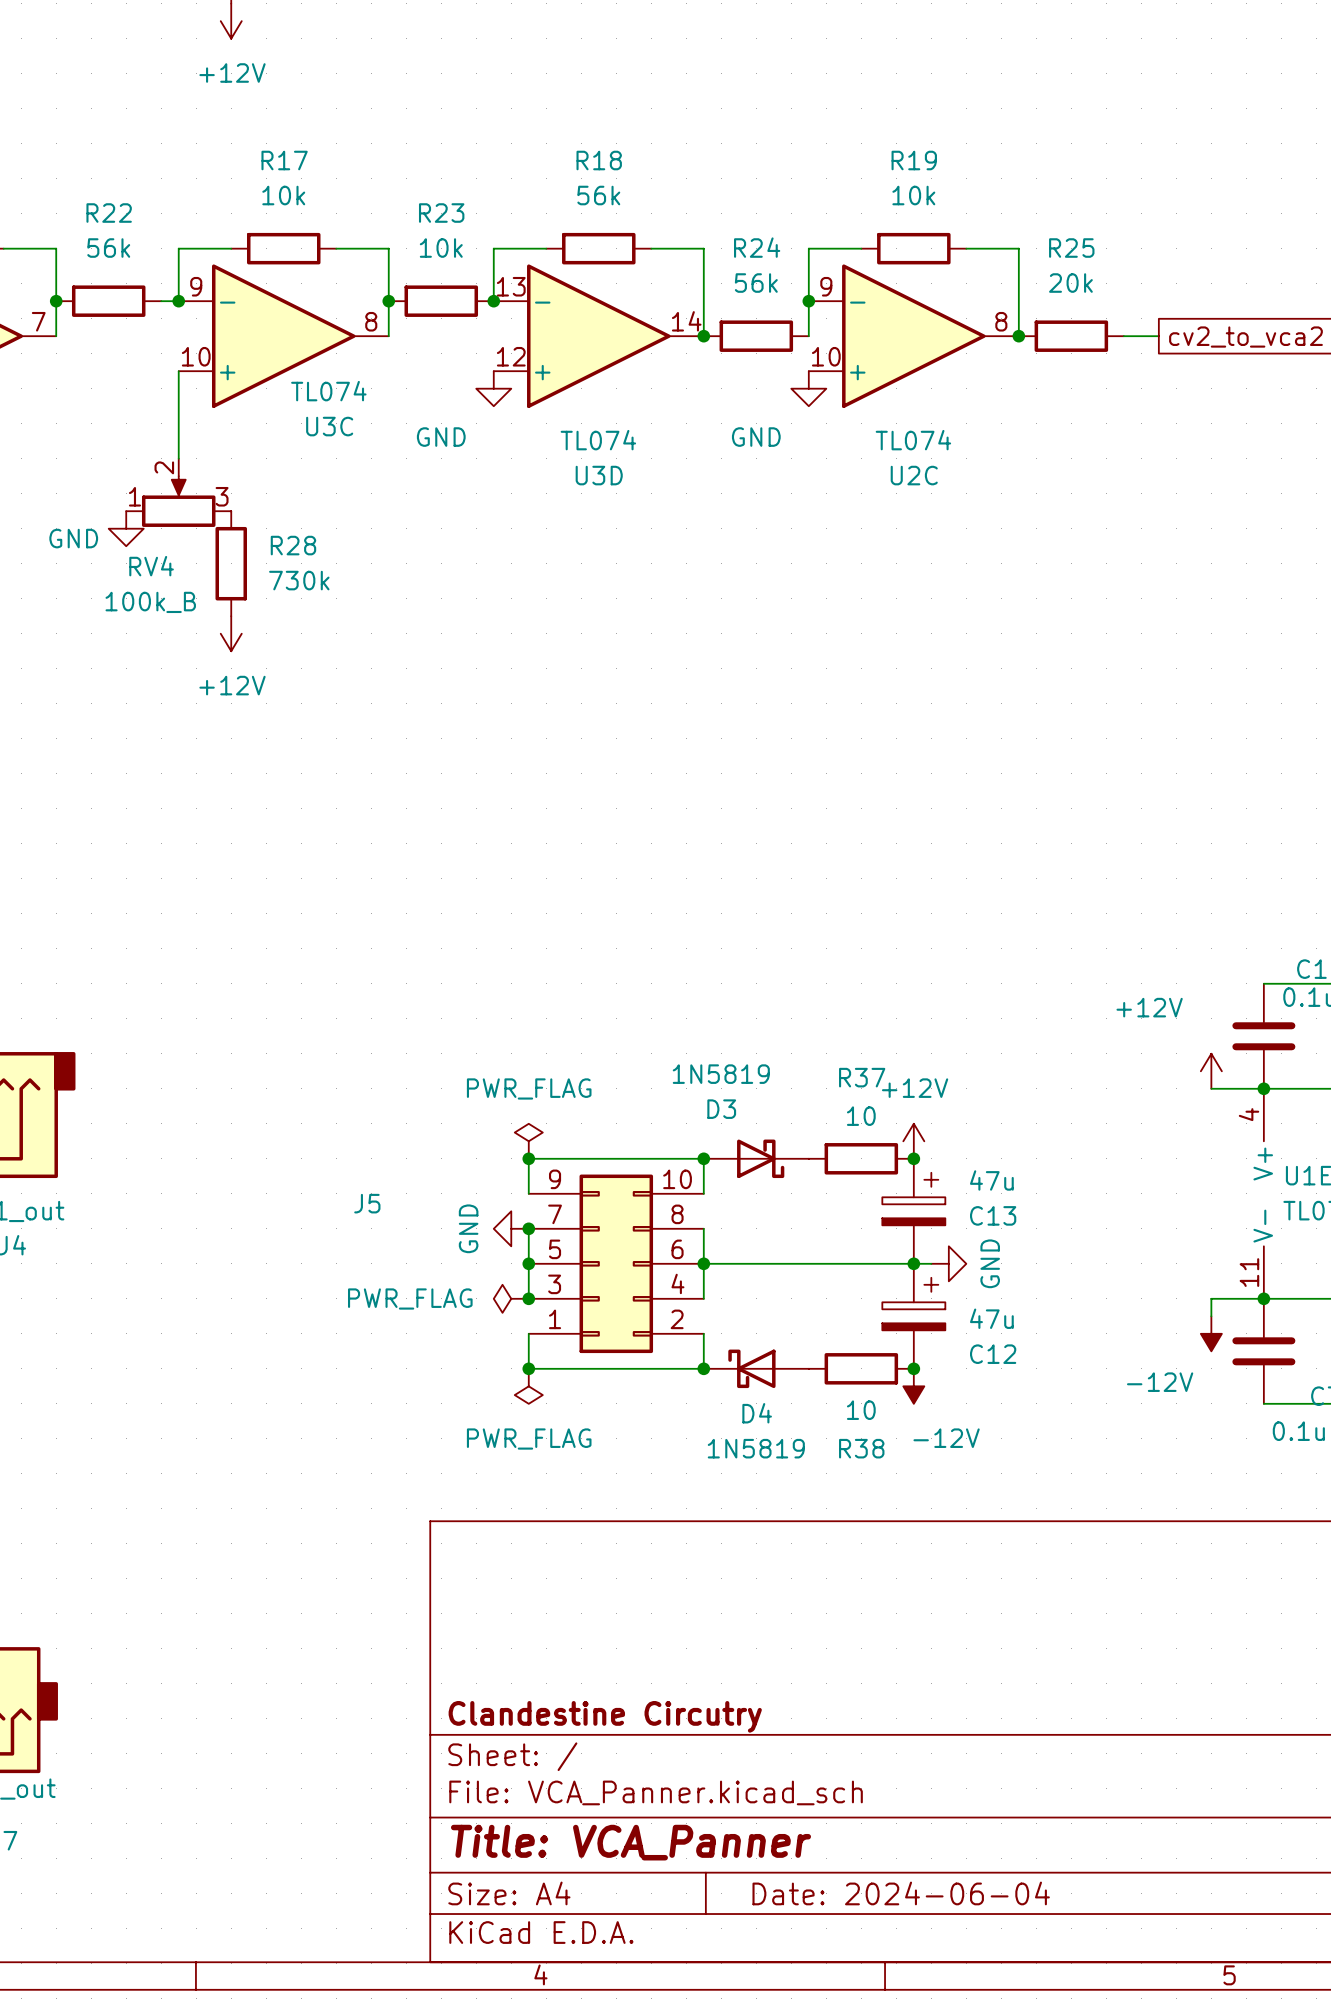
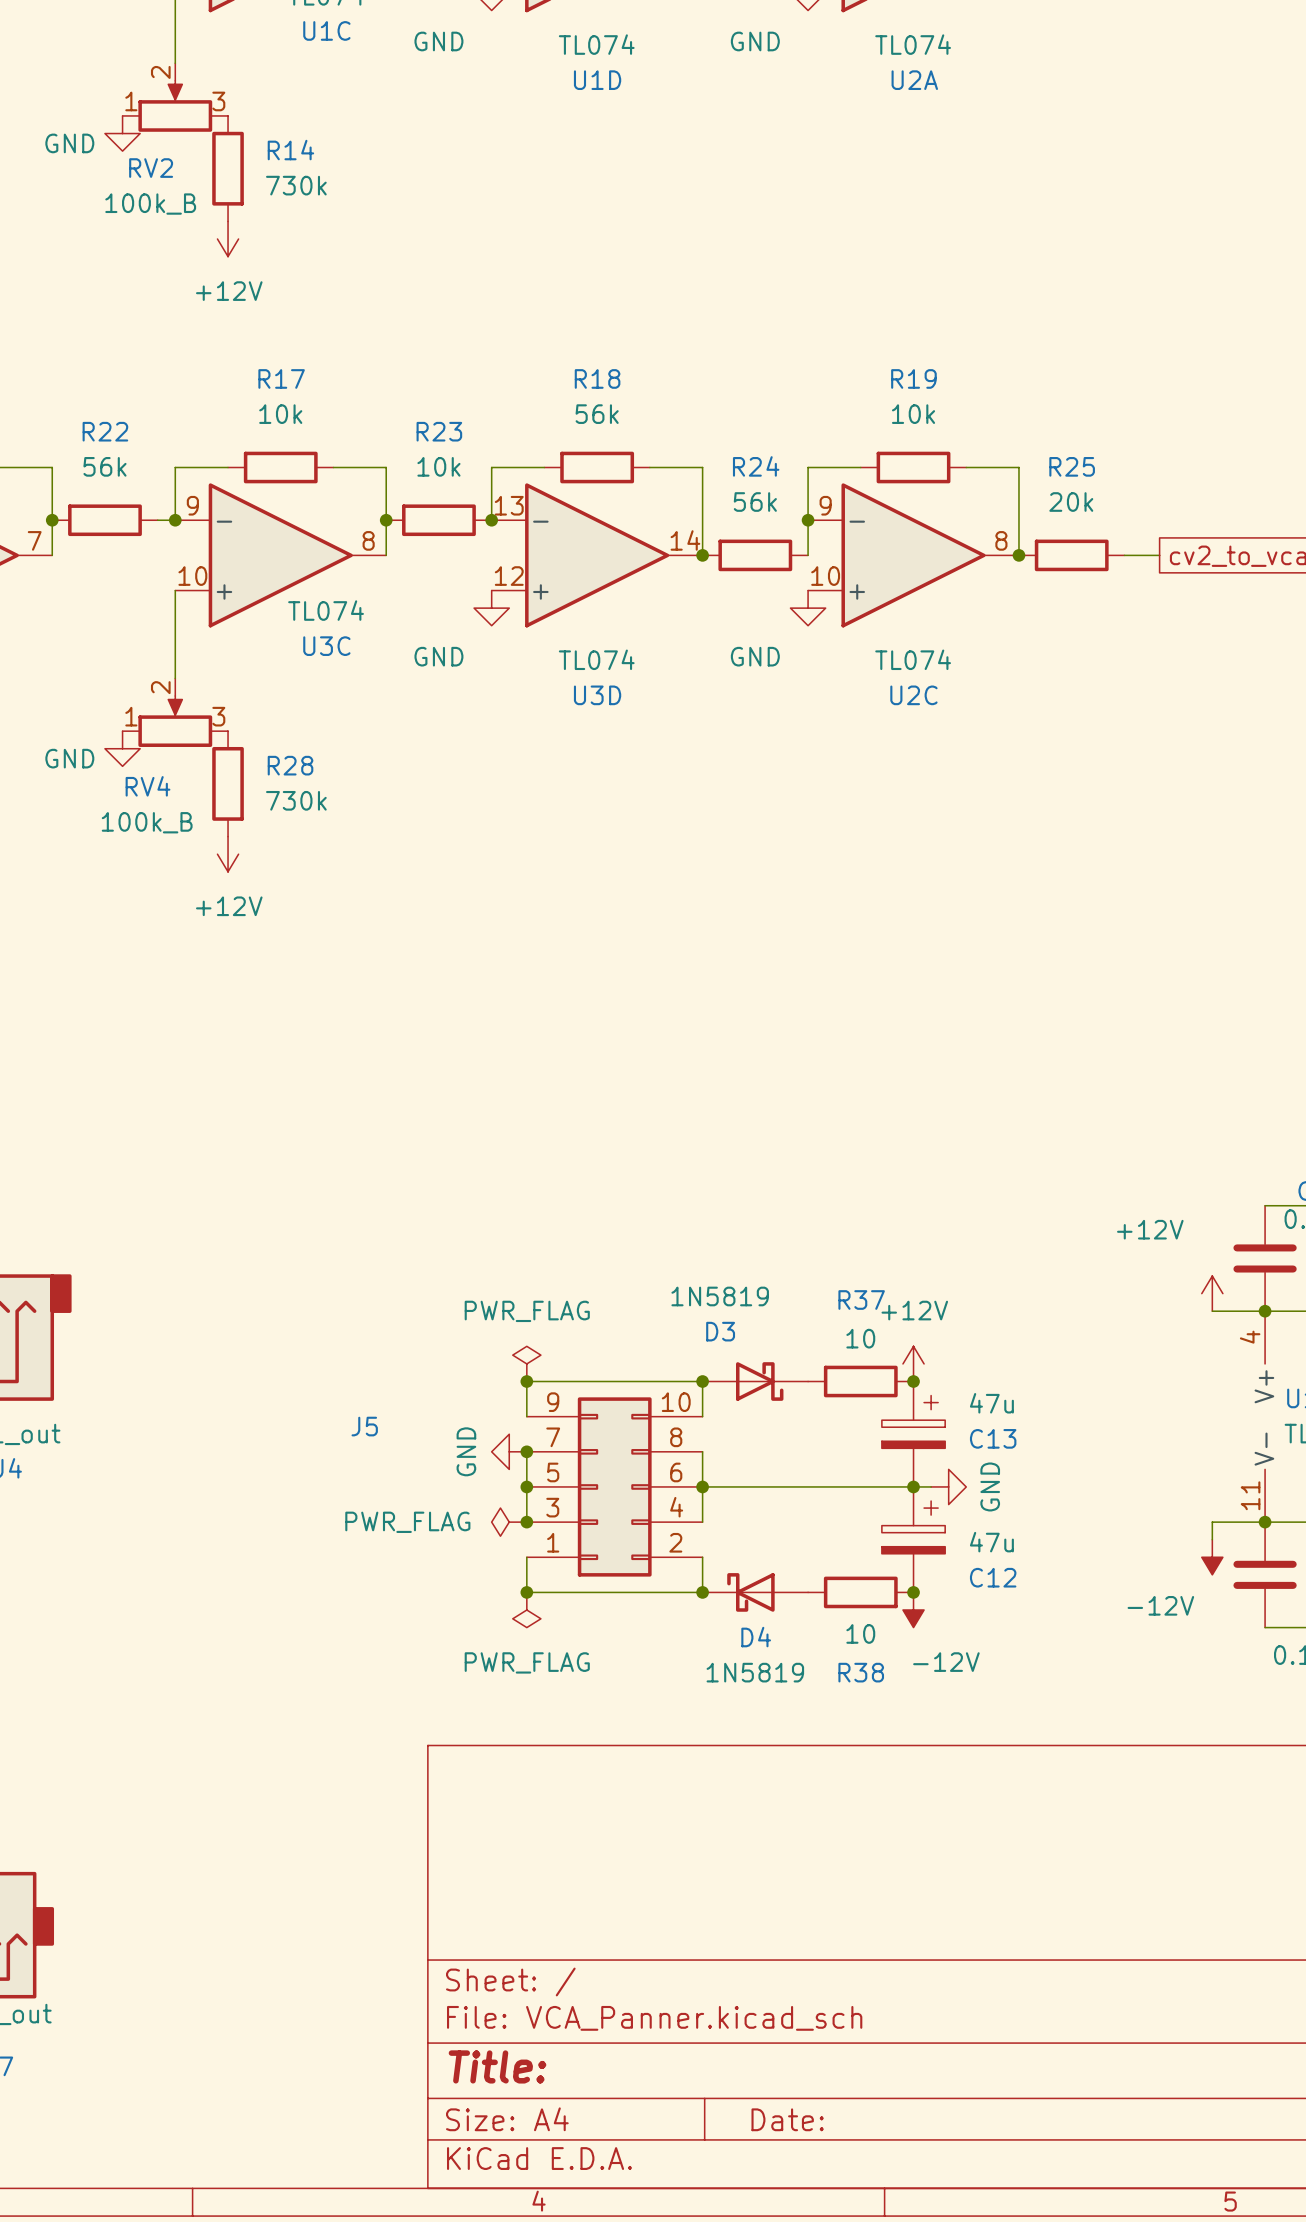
title block: Clandestine Circutry (605, 1716) -> none
title block: Title: VCA_Panner (630, 1842) -> Title: (497, 2066)
title block: Date: 2024-06-04 (901, 1893) -> Date: (787, 2119)

